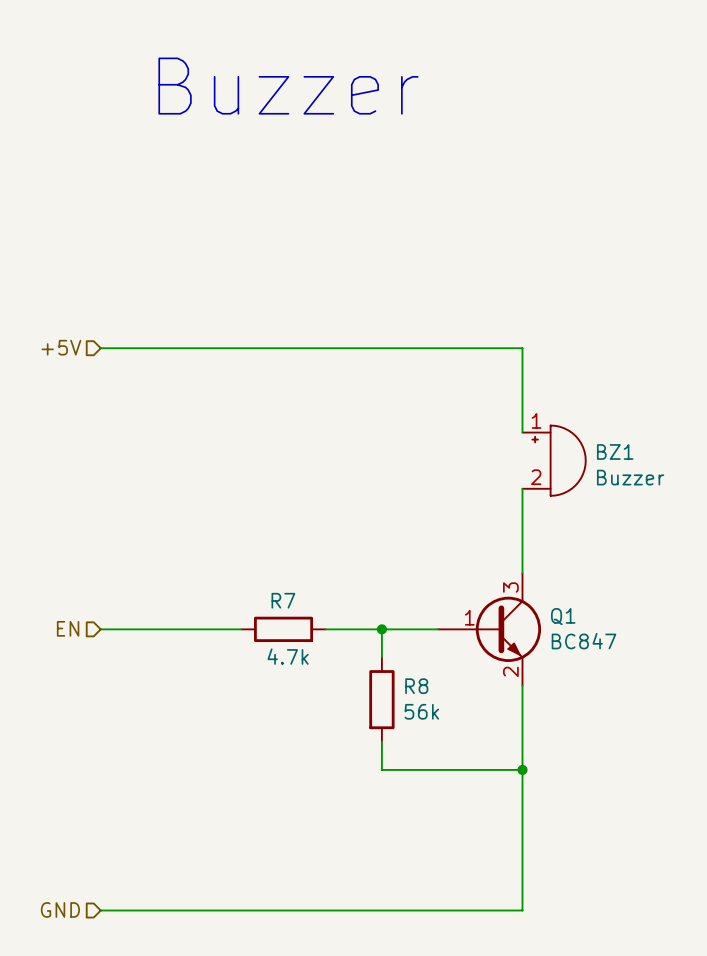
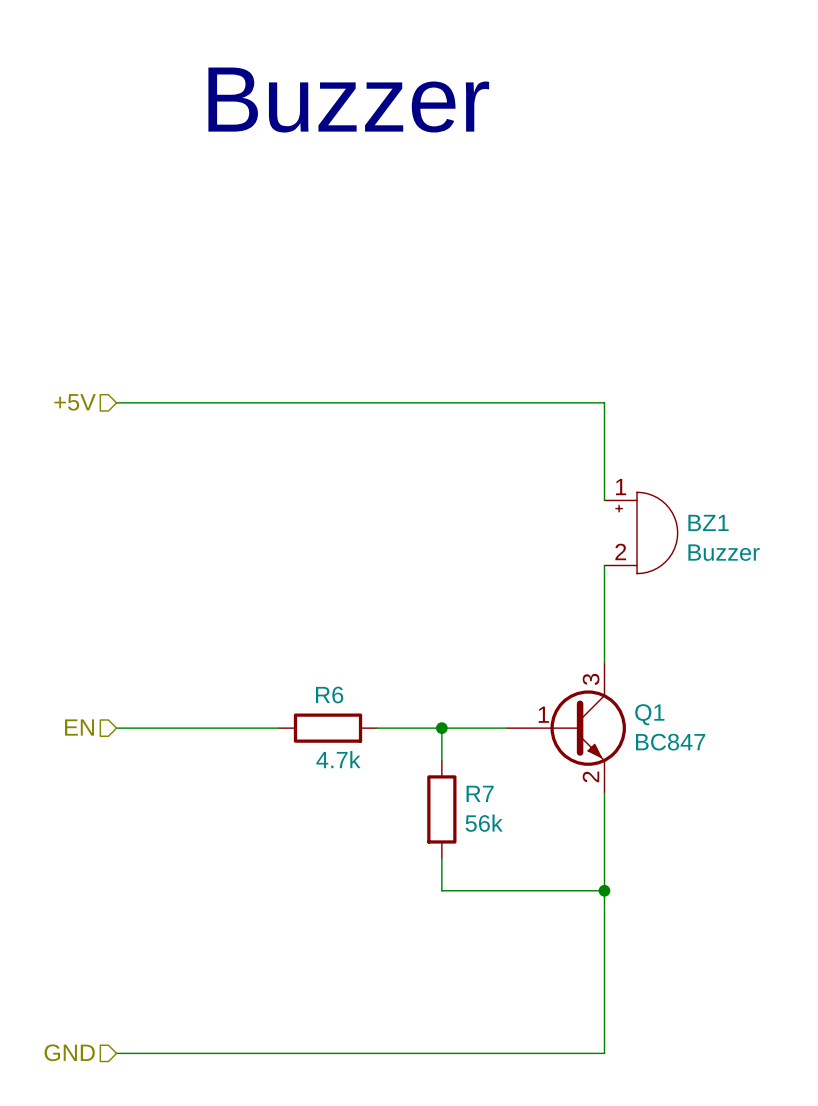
R7 name: R7 (283, 600) -> R6 (329, 694)
R8 name: R8 (416, 686) -> R7 (480, 793)

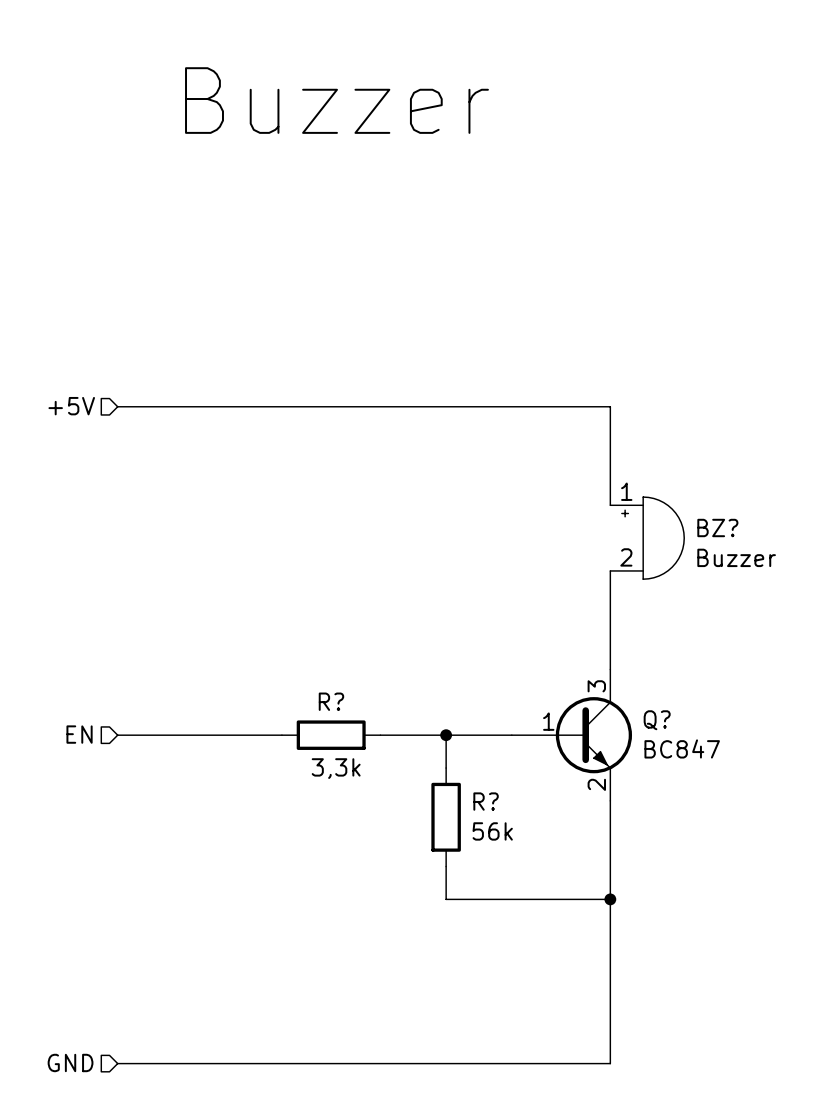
BZ1 name: BZ1 (708, 522) -> BZ? (717, 527)
R6 name: R6 (329, 694) -> R? (331, 701)
Q1 name: Q1 (649, 714) -> Q? (657, 720)
R6 value: 4.7k (338, 759) -> 3,3k (336, 768)
R7 name: R7 (480, 793) -> R? (486, 801)

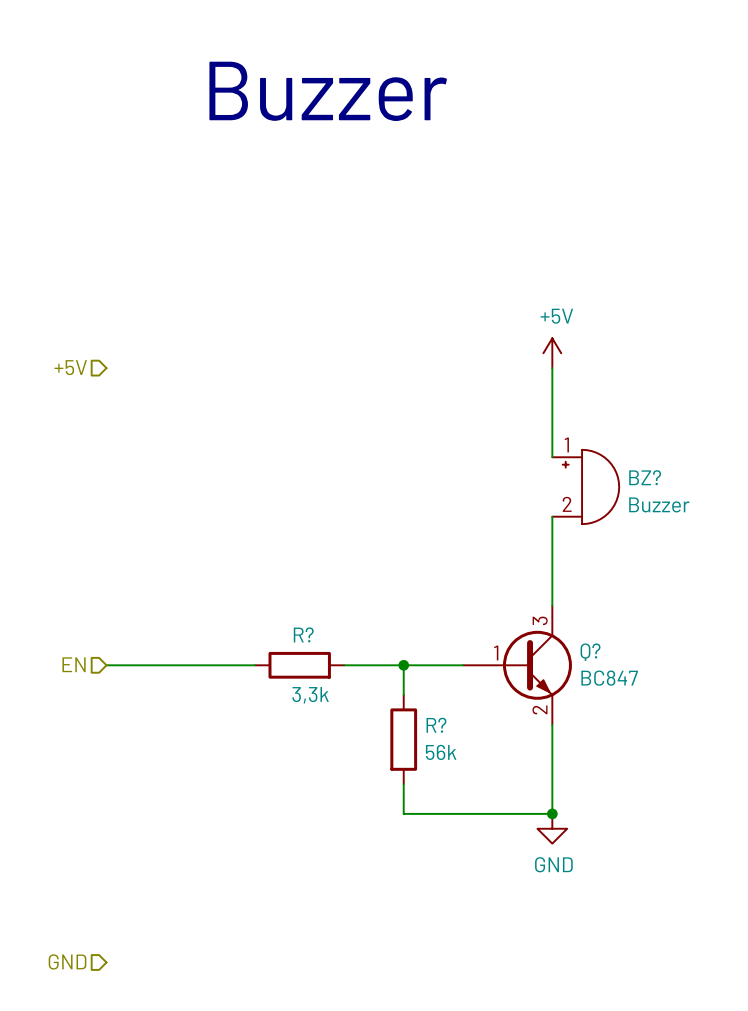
power symbol: none -> +5V (552, 353)
wire: (117, 406) (610, 406) -> none
wire: (610, 899) (610, 1063) (117, 1063) -> none
power symbol: none -> GND (552, 828)

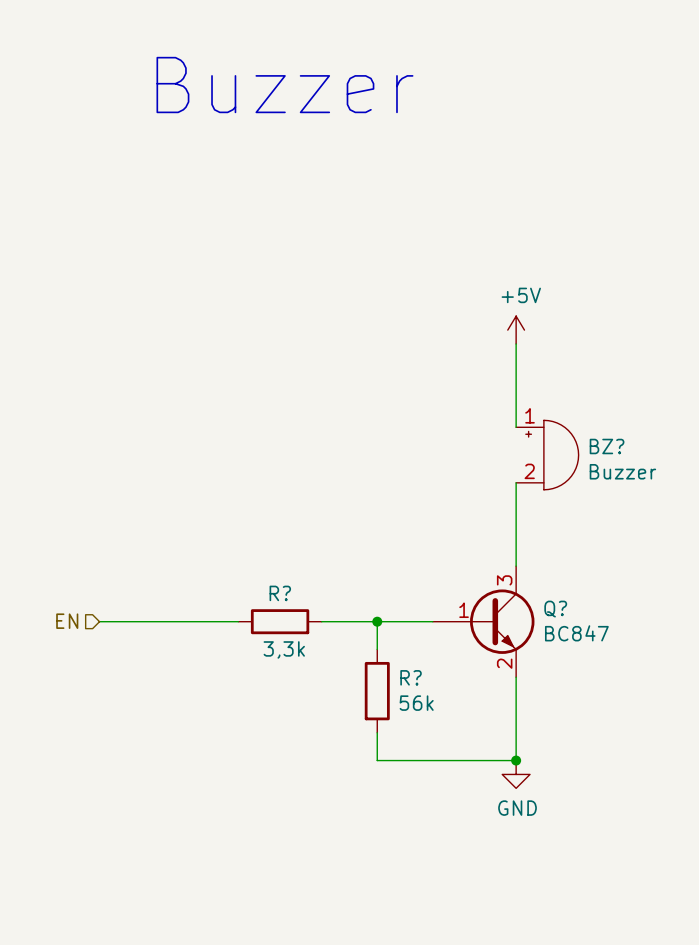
hierarchical label: +5V (70, 367) -> none
hierarchical label: GND (67, 961) -> none

